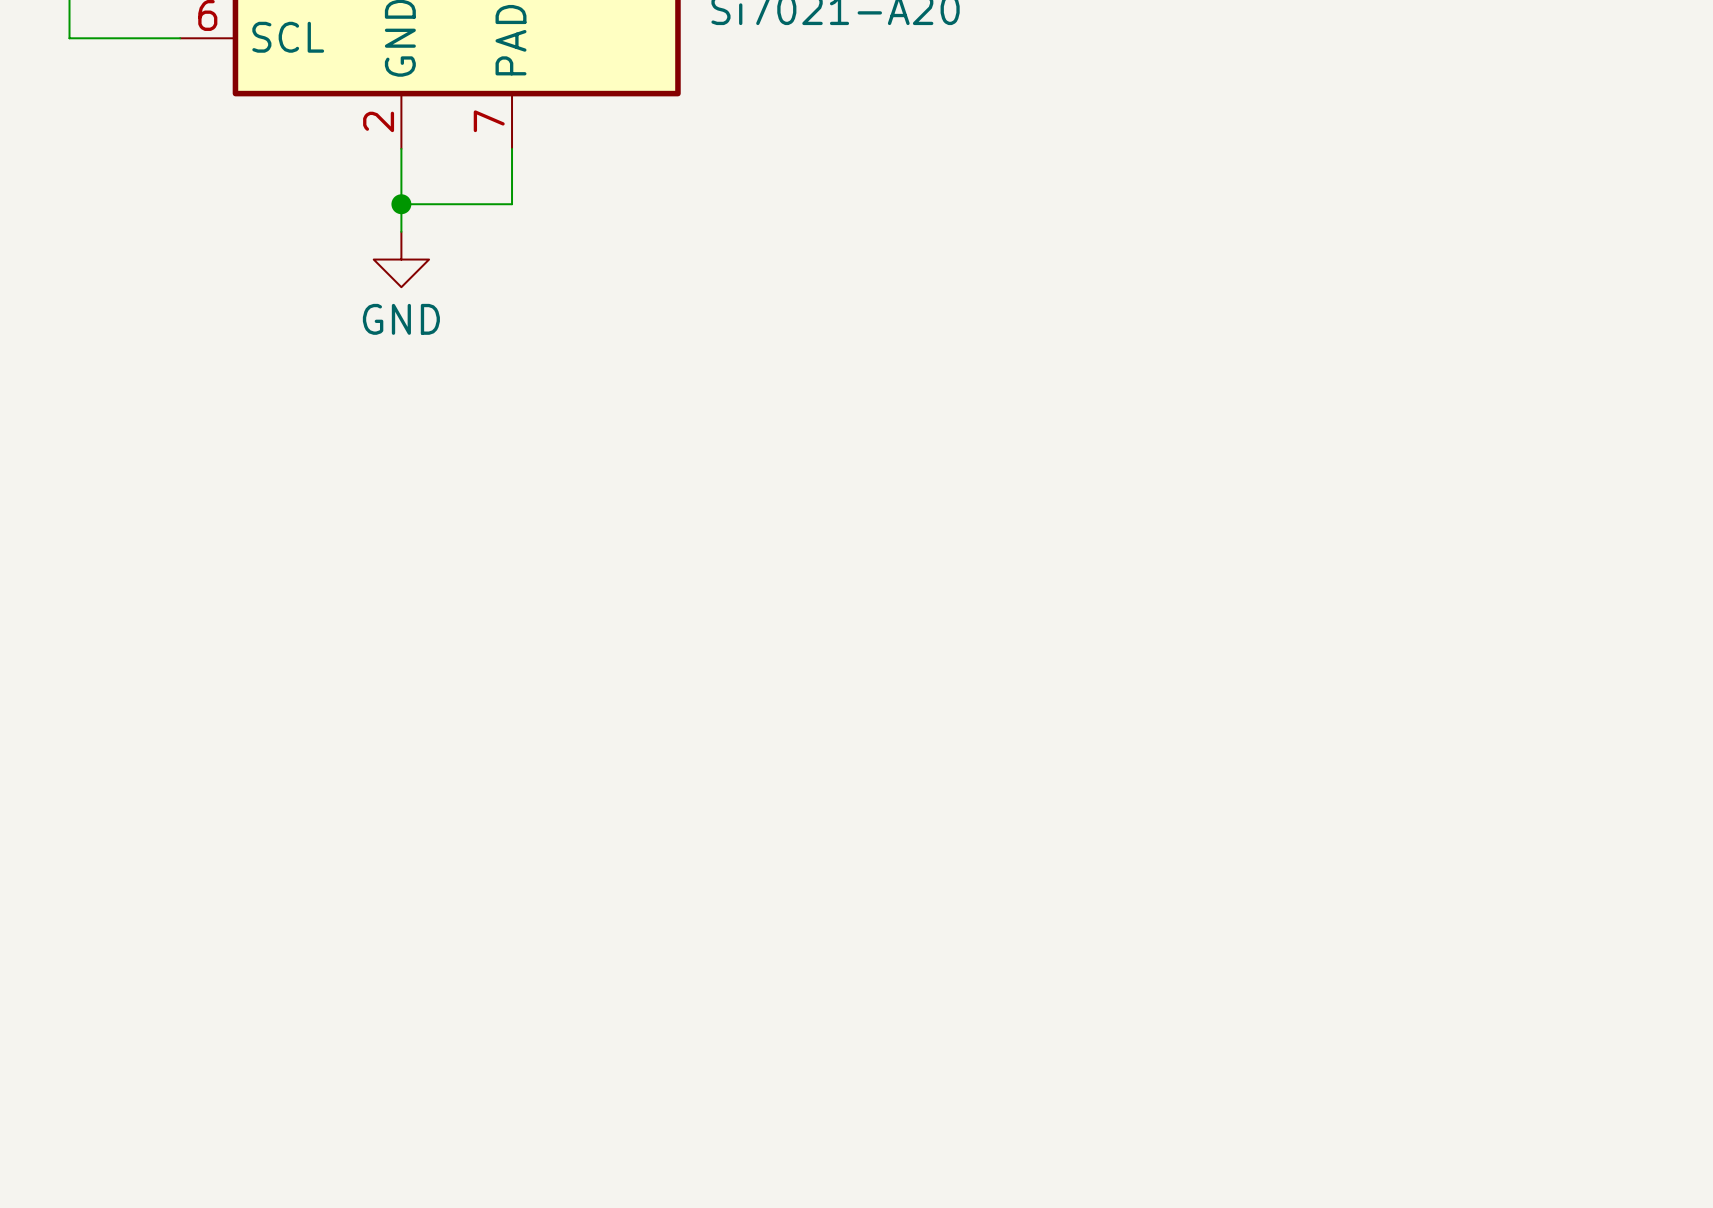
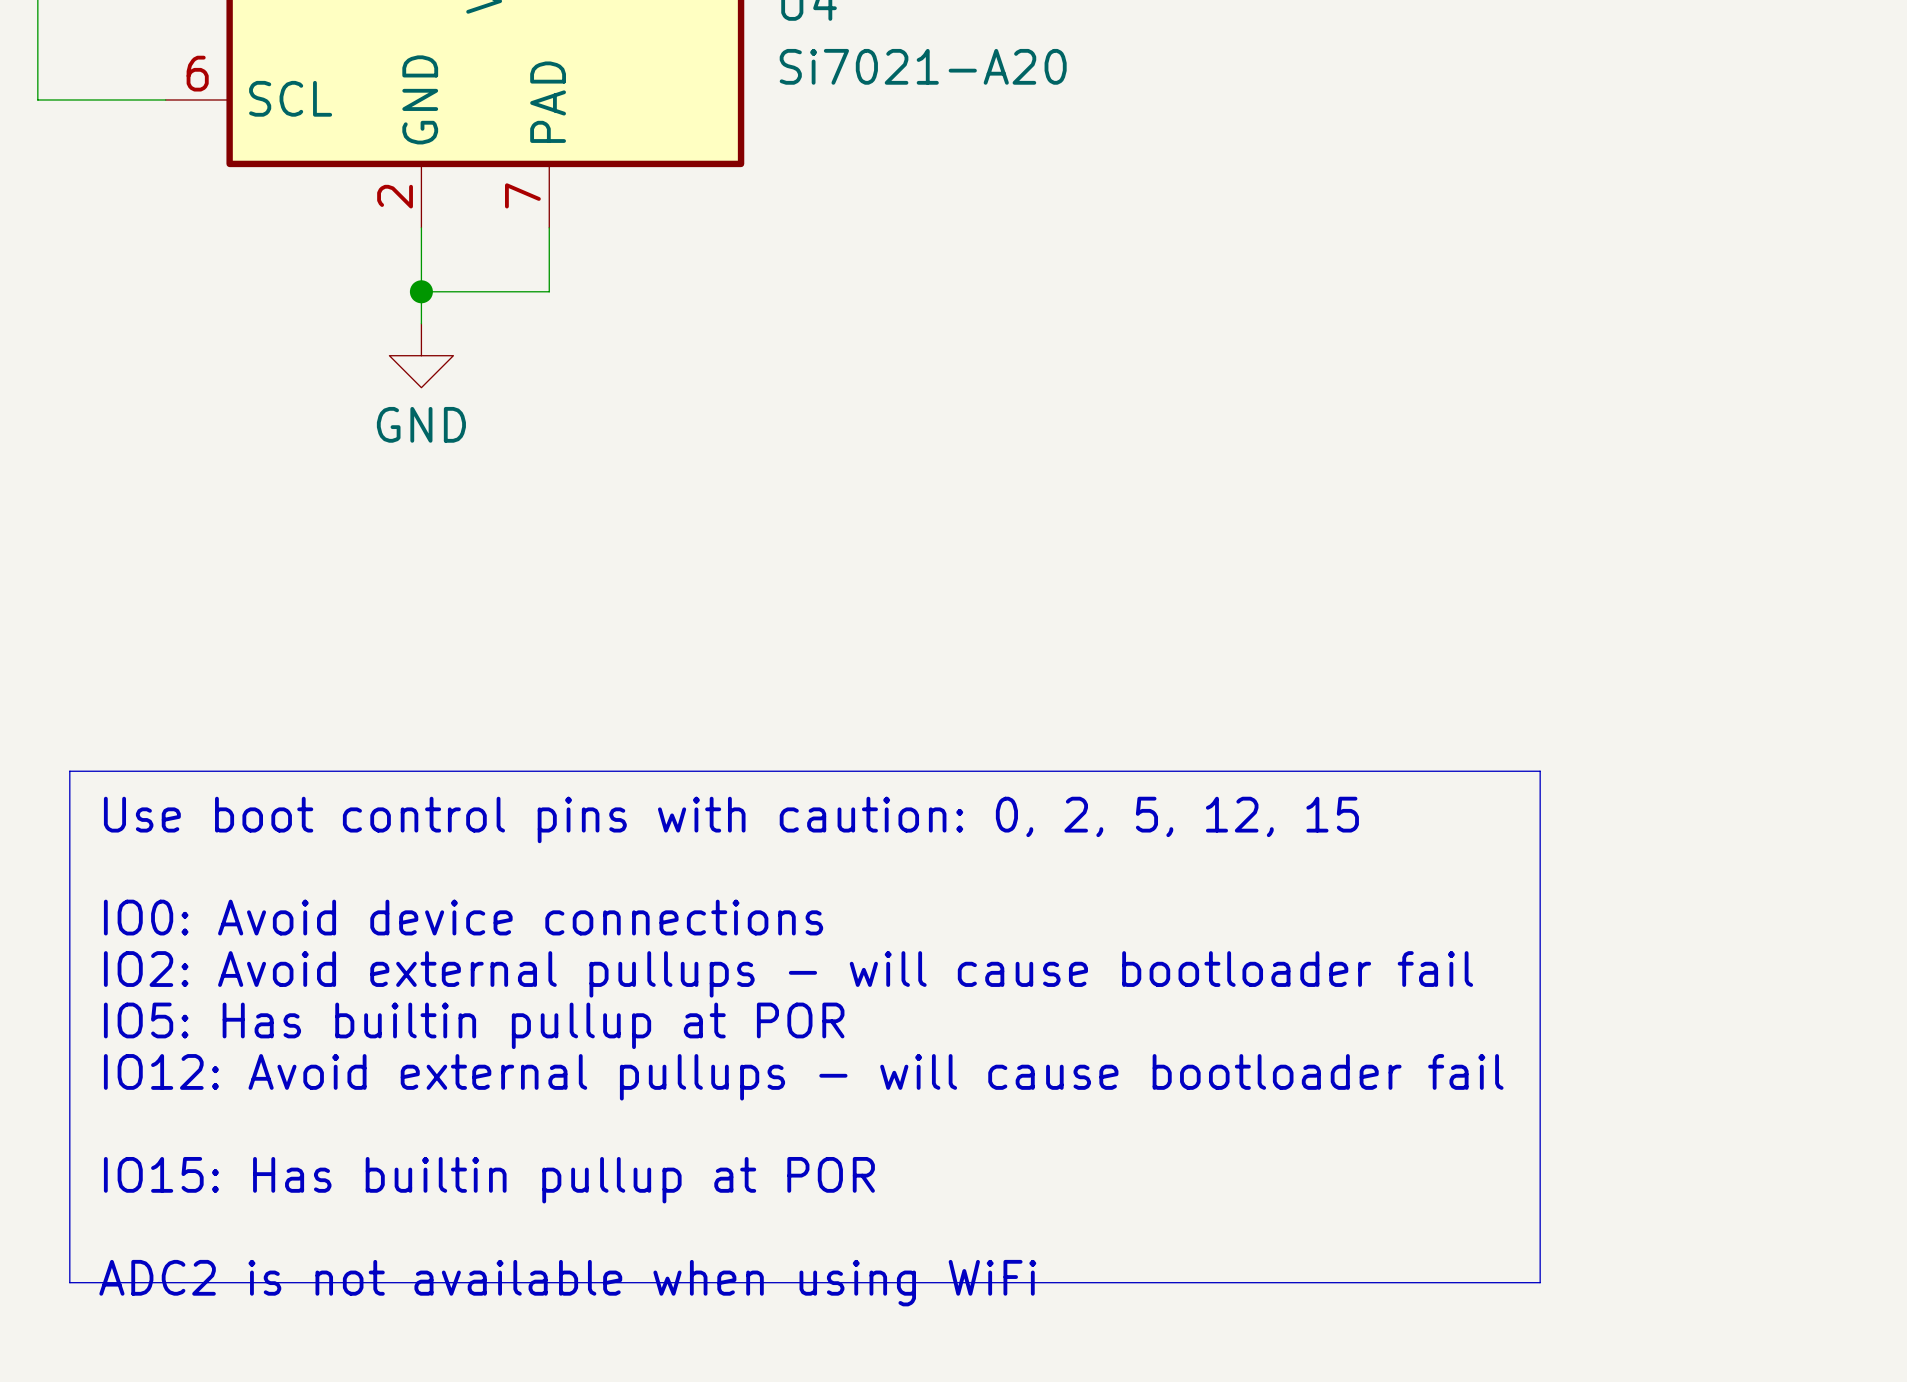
line: none -> (69, 771) (1540, 771) (1540, 1282) (69, 1282) (69, 771)
text: none -> Use boot control pins with caution: 0, 2, 5, 12, 15 (731, 819)
text: none -> IO0: Avoid device connections (463, 917)
text: none -> IO2: Avoid external pullups - will cause bootloader fail (788, 974)
text: none -> IO5: Has builtin pullup at POR (474, 1025)
text: none -> IO12: Avoid external pullups - will cause bootloader fail (803, 1077)
text: none -> IO15: Has builtin pullup at POR (489, 1180)
text: none -> ADC2 is not available when using WiFi (567, 1283)

